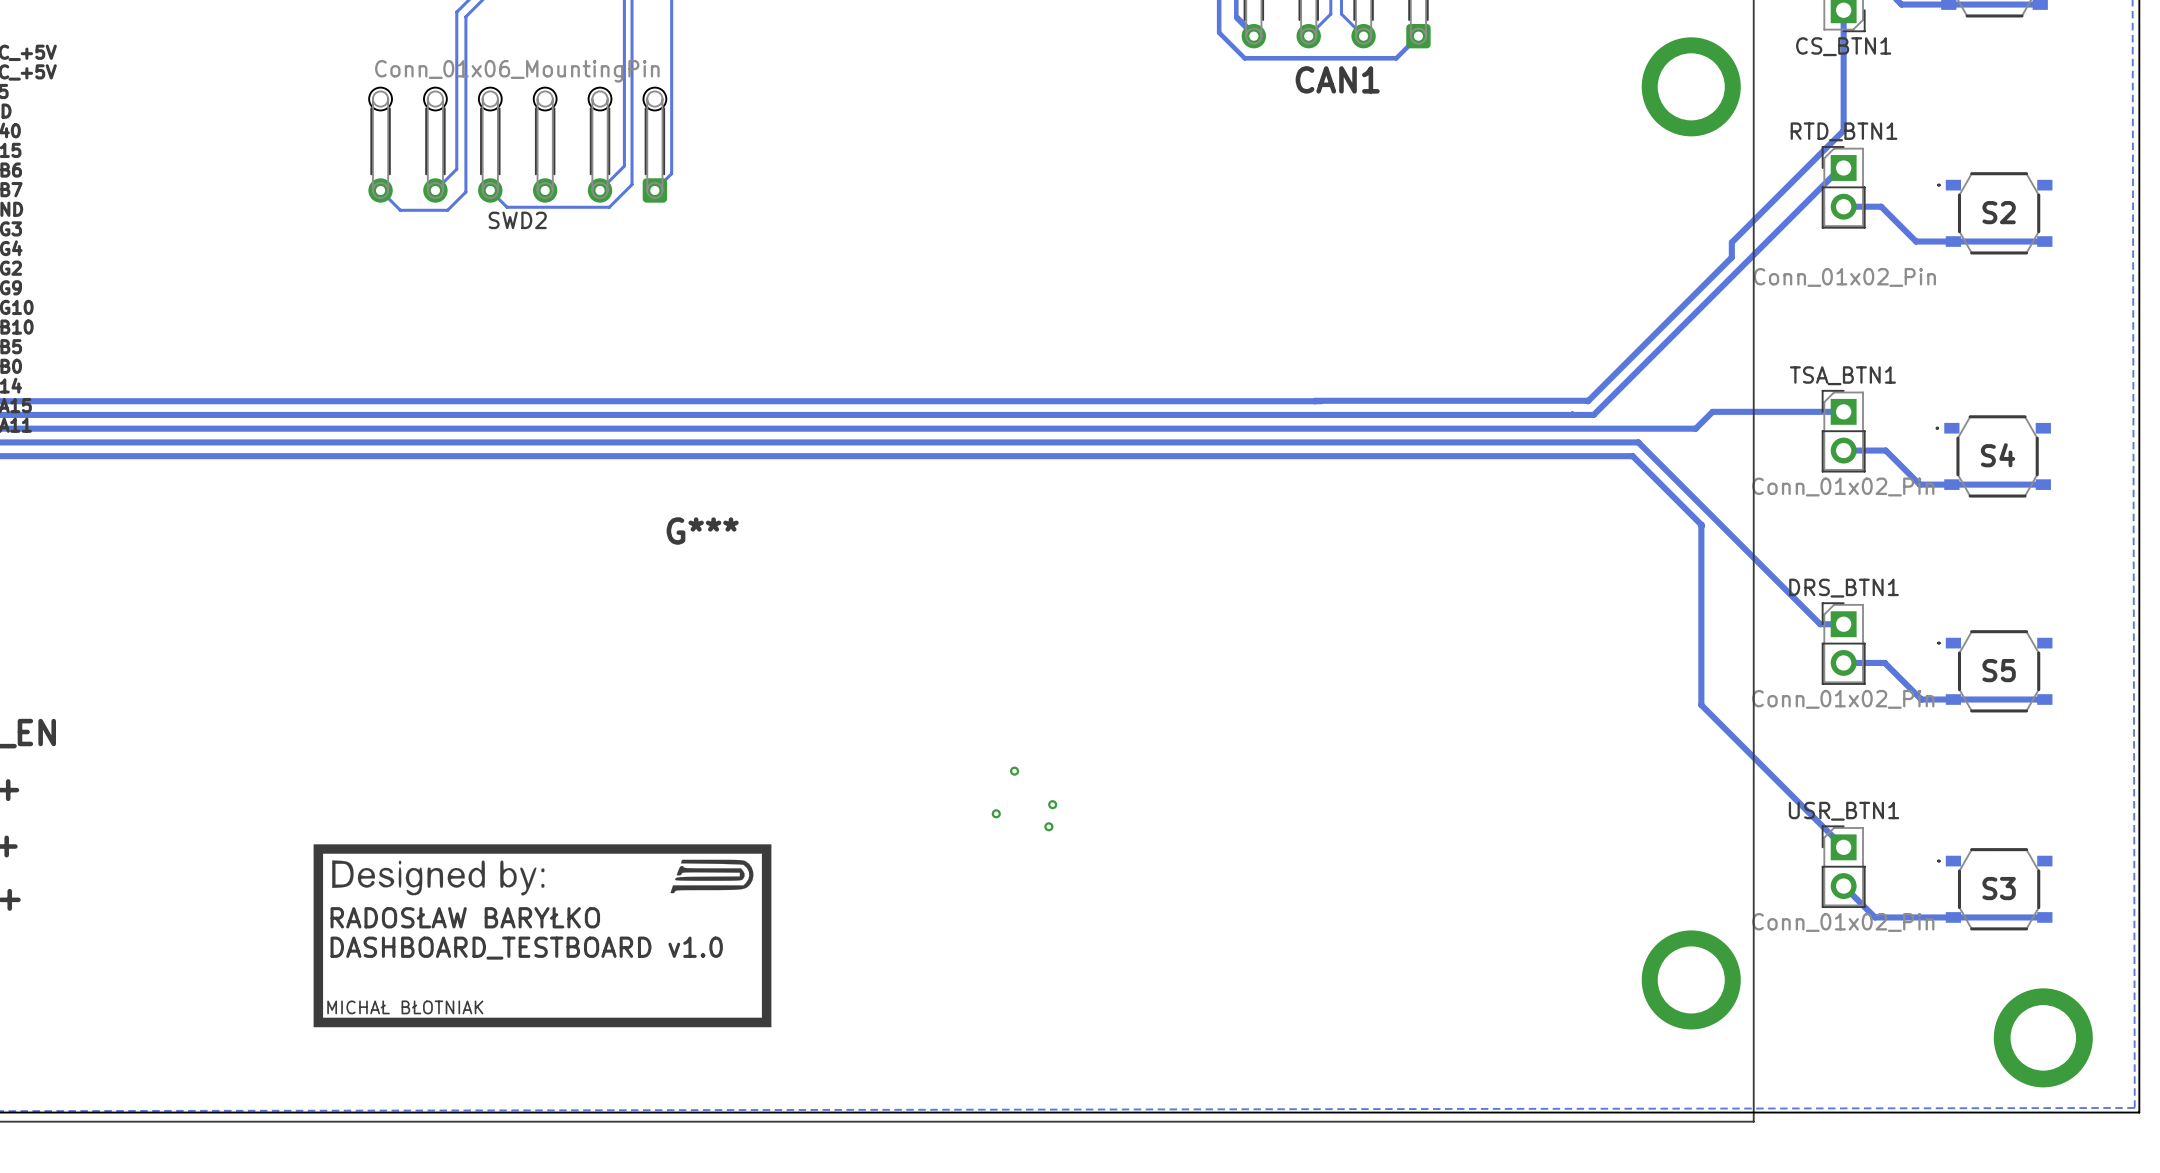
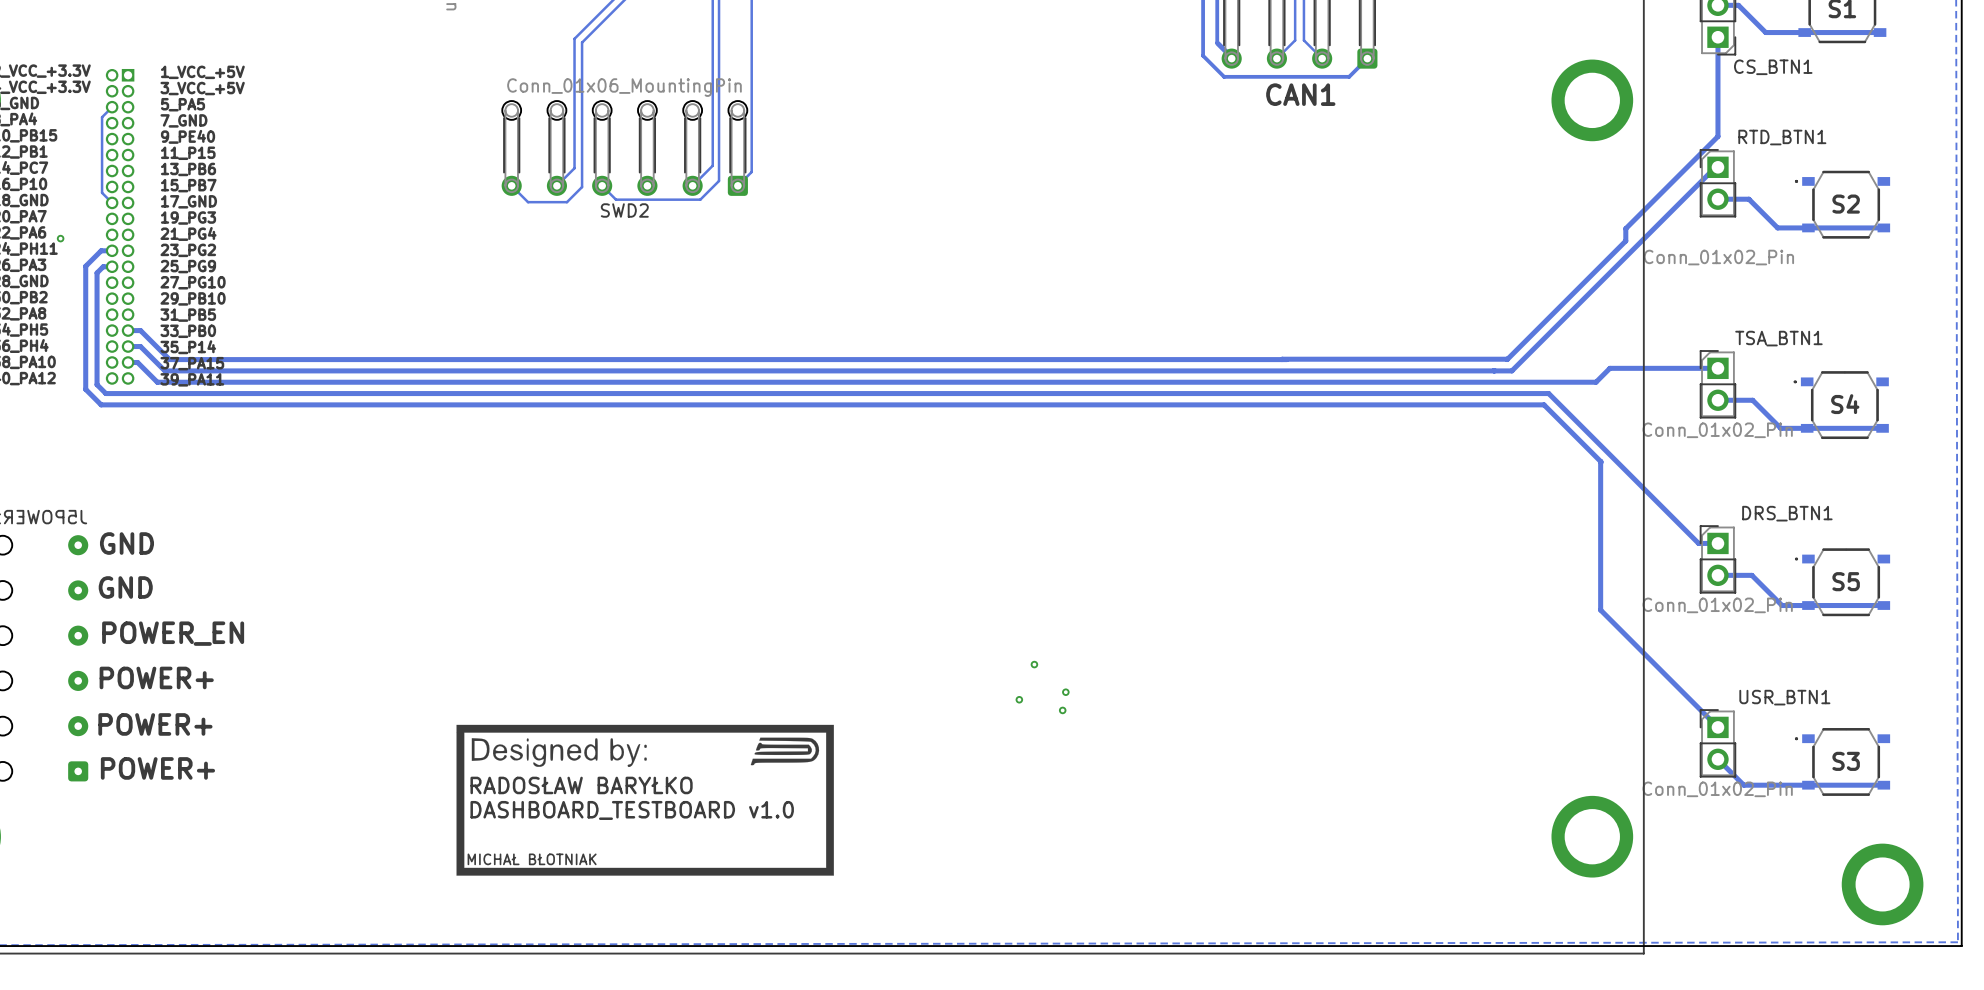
CS_BTN1 name position: CS_BTN1 (1843, 46) -> CS_BTN1 (1773, 67)
RTD_BTN1 name position: RTD_BTN1 (1844, 131) -> RTD_BTN1 (1782, 137)
TSA_BTN1 name position: TSA_BTN1 (1842, 375) -> TSA_BTN1 (1778, 338)
G***: (702, 531) -> none
DRS_BTN1 name position: DRS_BTN1 (1844, 588) -> DRS_BTN1 (1787, 513)
USR_BTN1 name position: USR_BTN1 (1844, 811) -> USR_BTN1 (1784, 697)

